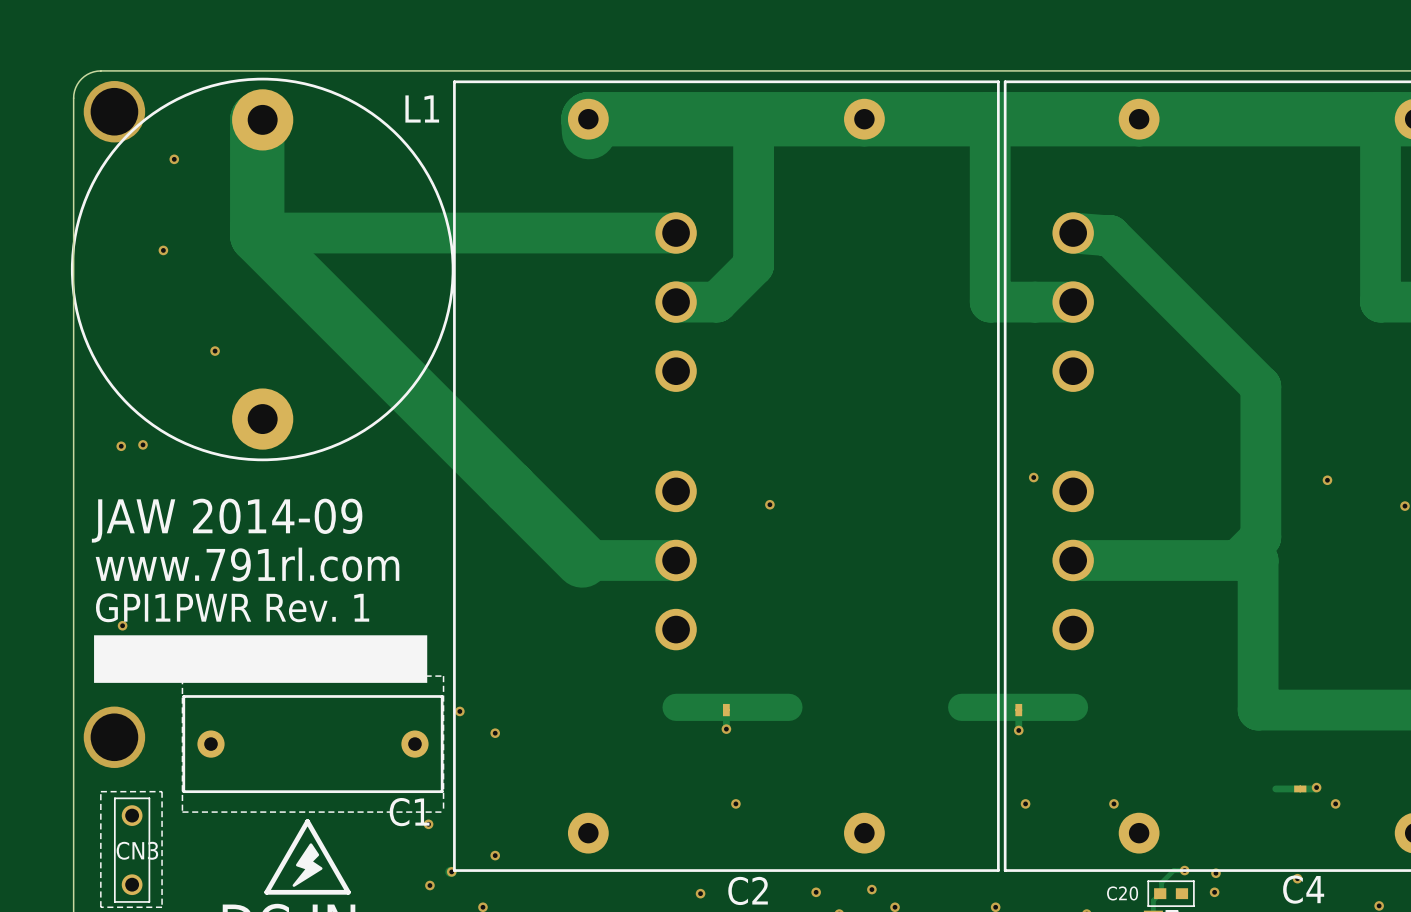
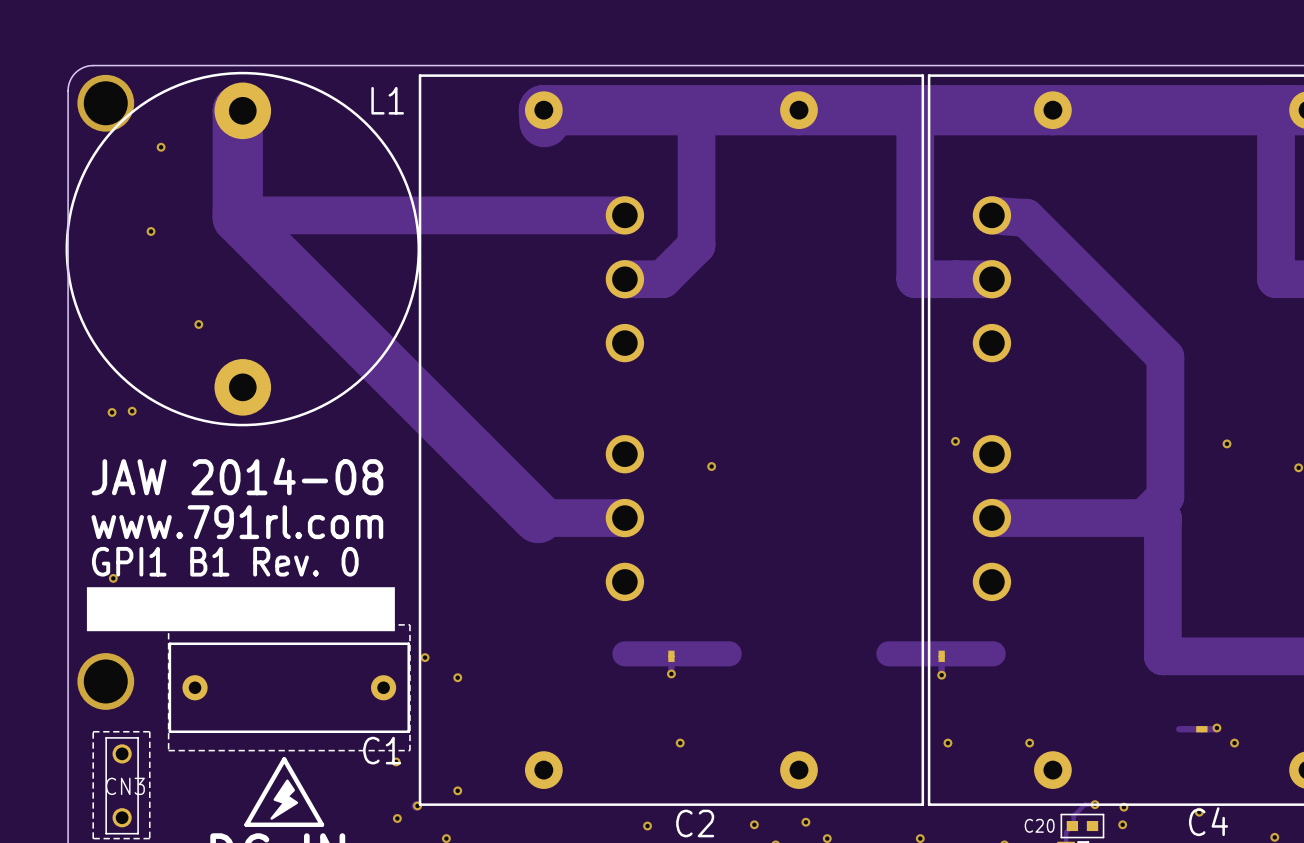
text: JAW 2014-09 (227, 520) -> JAW 2014-08 (237, 476)
text: GPI1PWR Rev. 1 (232, 607) -> GPI1 B1 Rev. 0 (225, 561)

